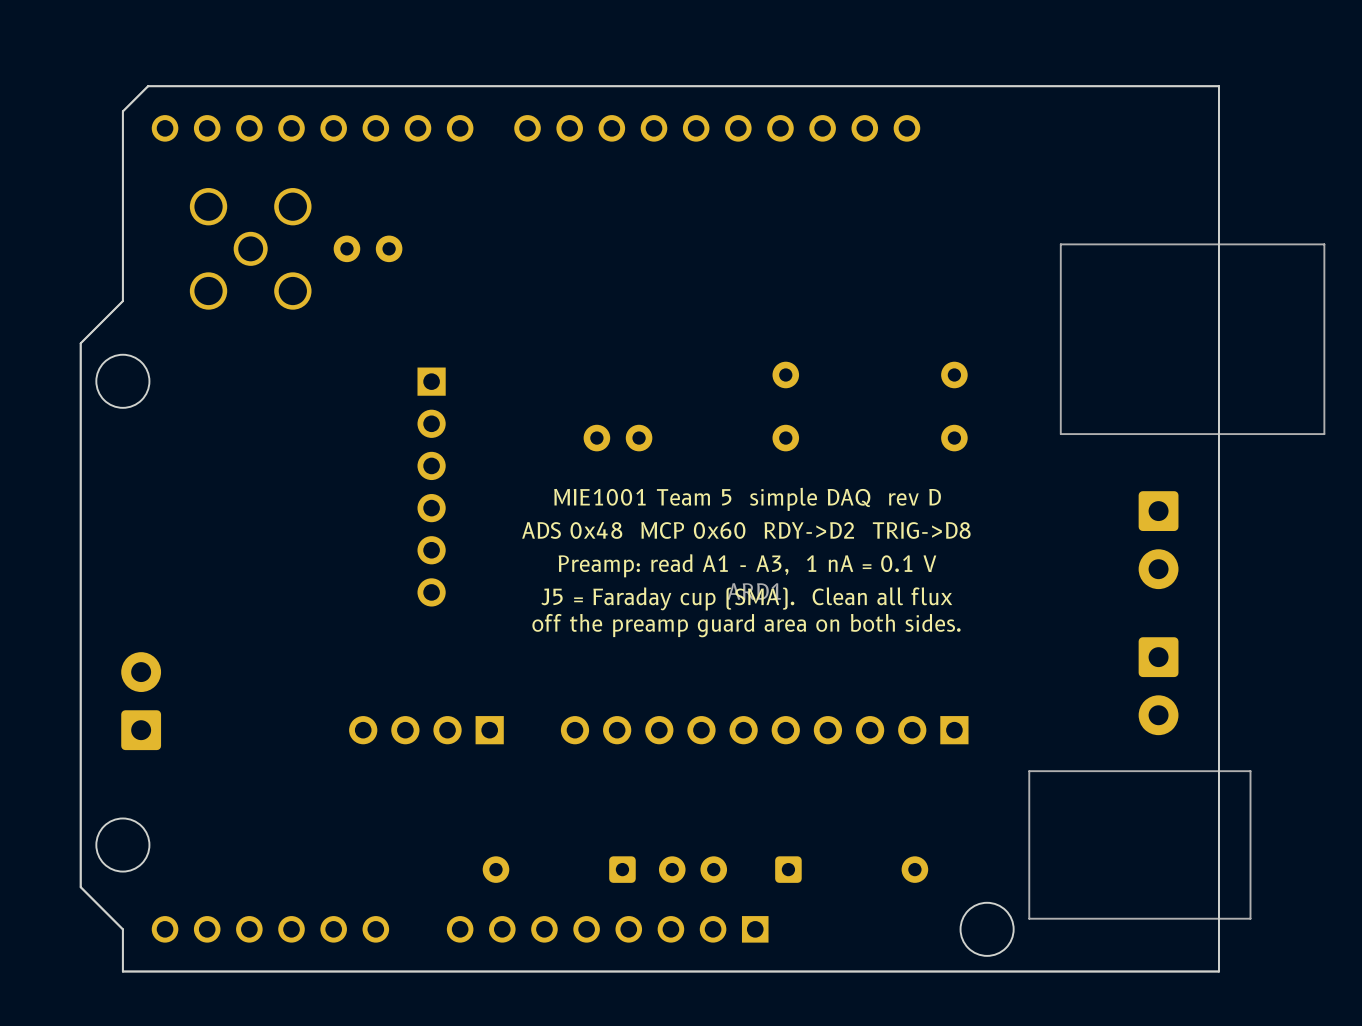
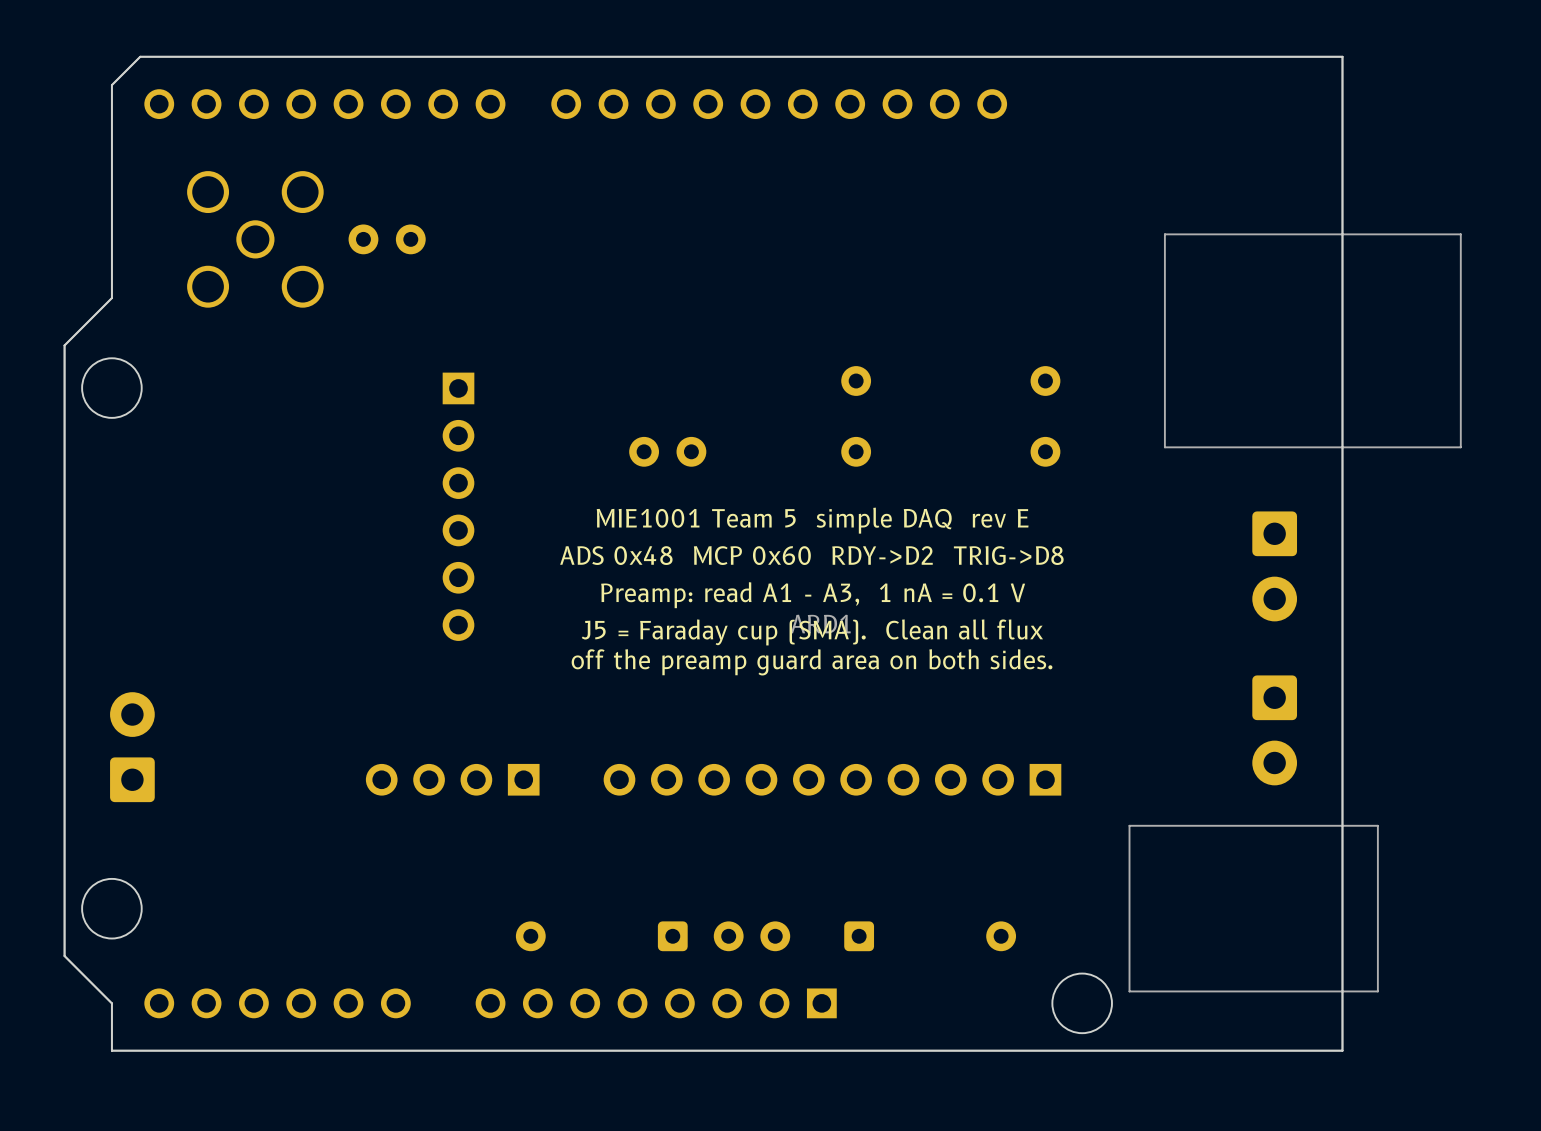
text: MIE1001 Team 5 simple DAQ rev D (747, 499) -> MIE1001 Team 5 simple DAQ rev E (812, 520)

